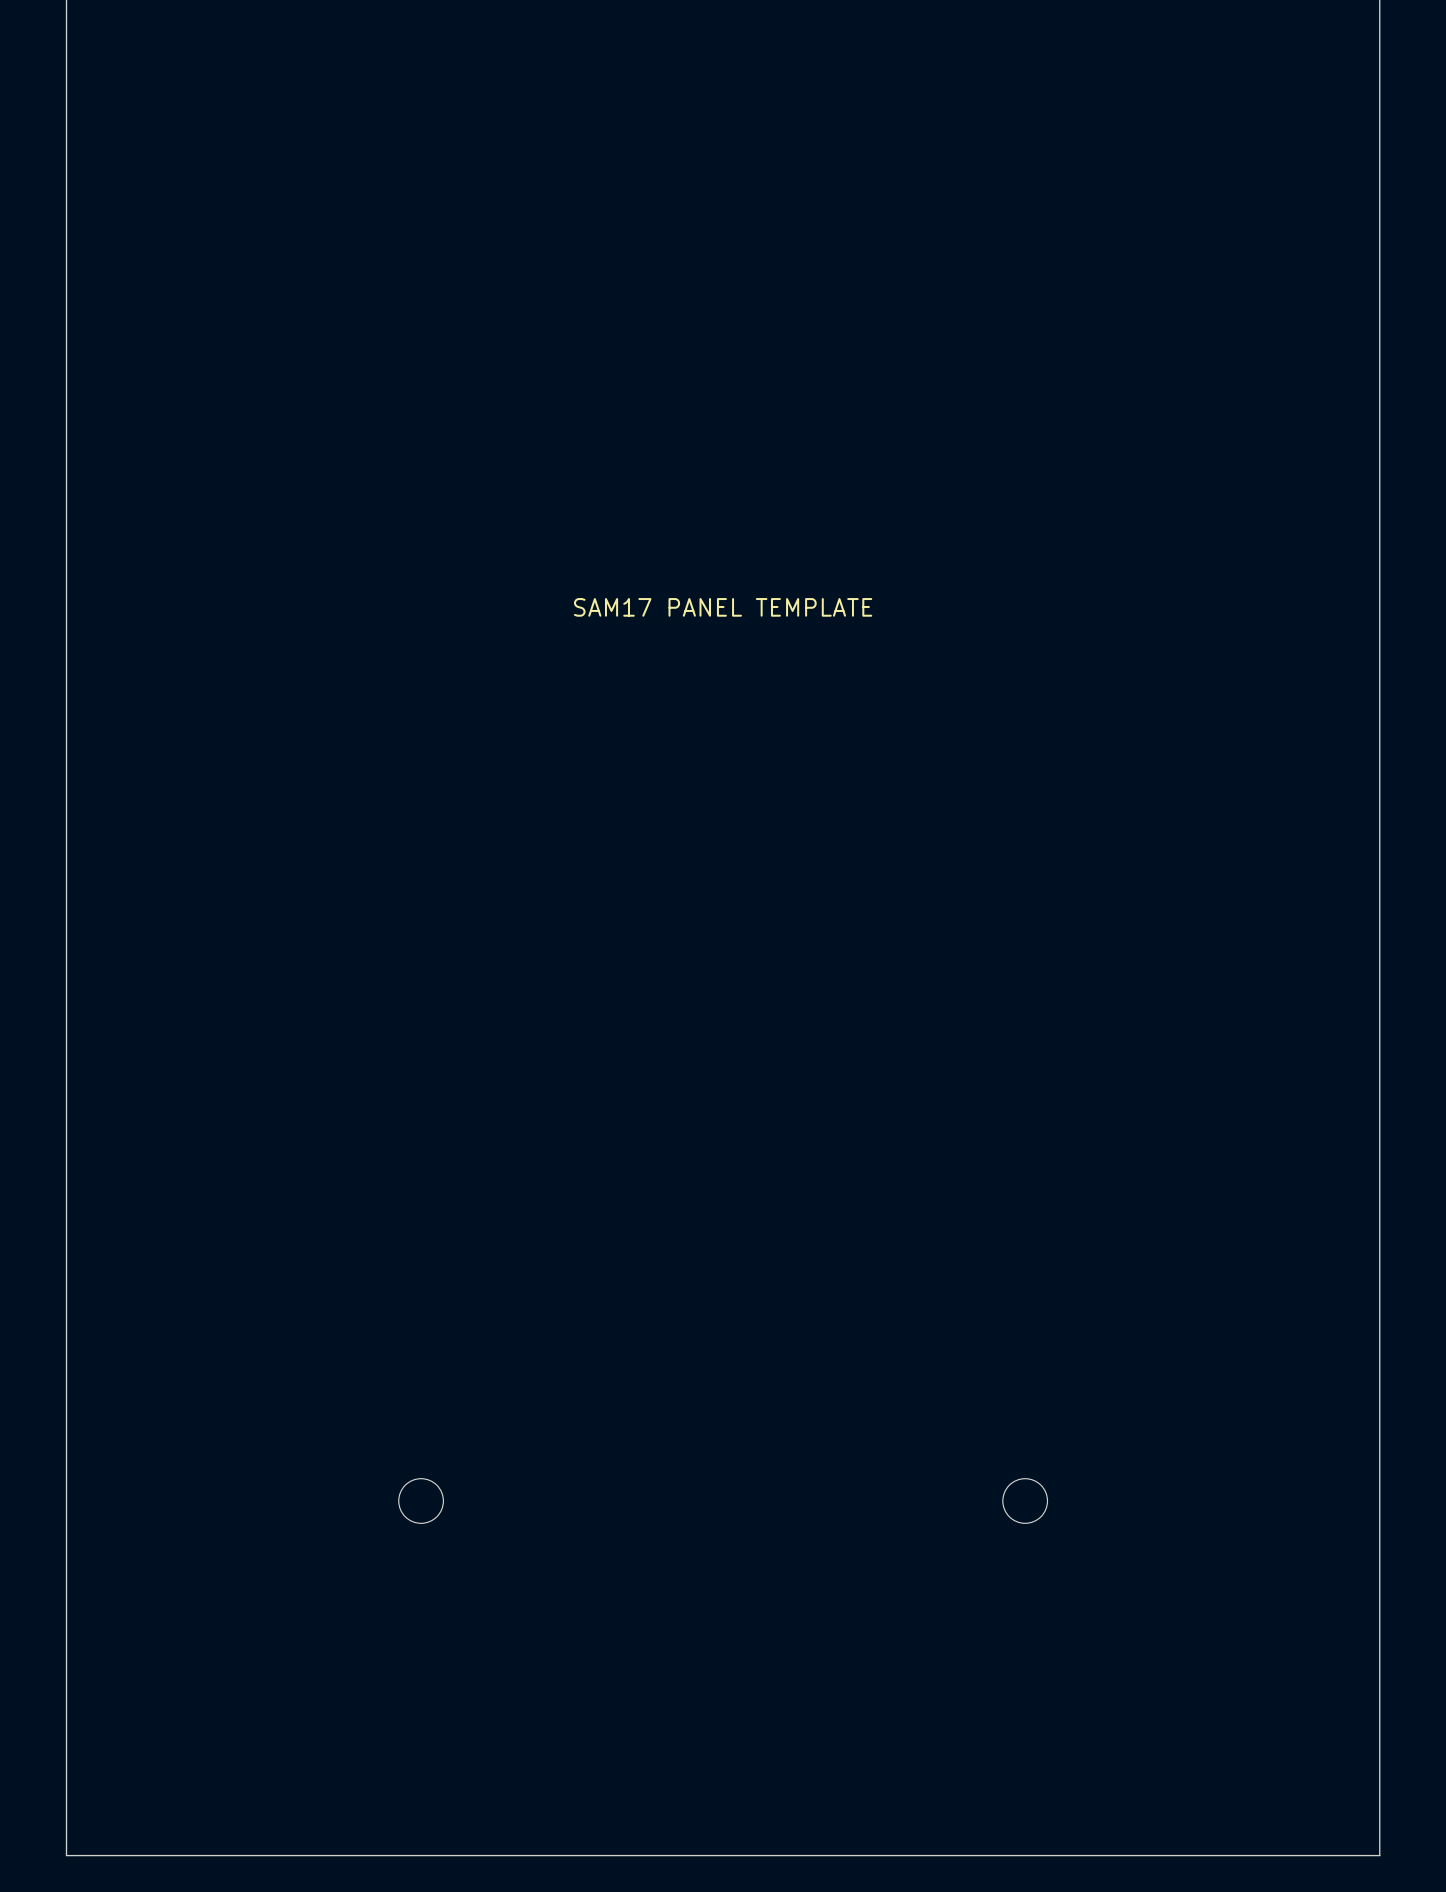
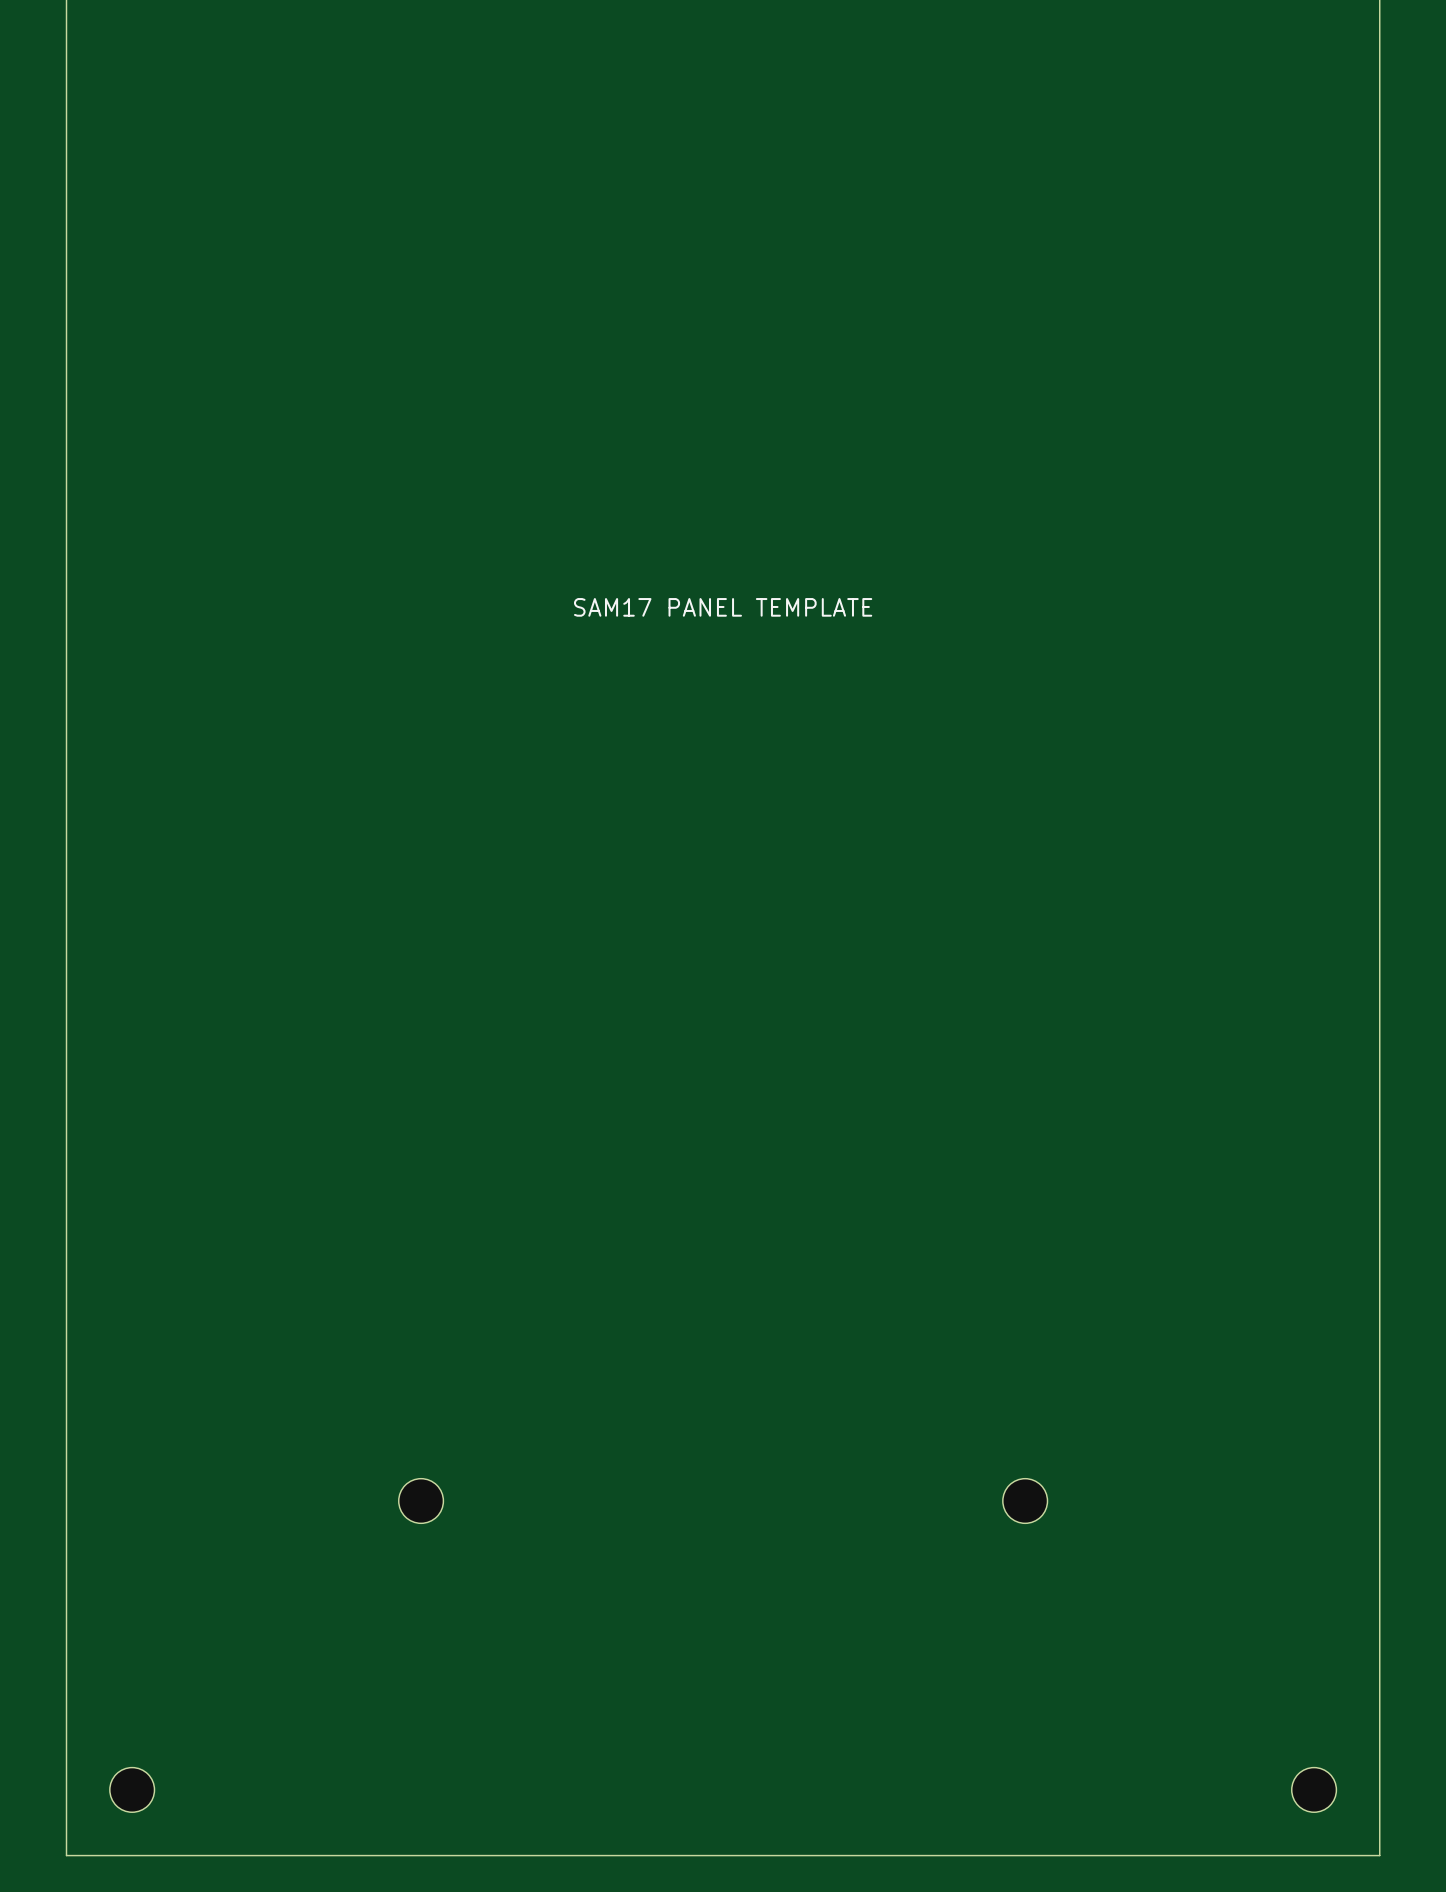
part: none -> (132, 1789)
part: none -> (1314, 1789)

